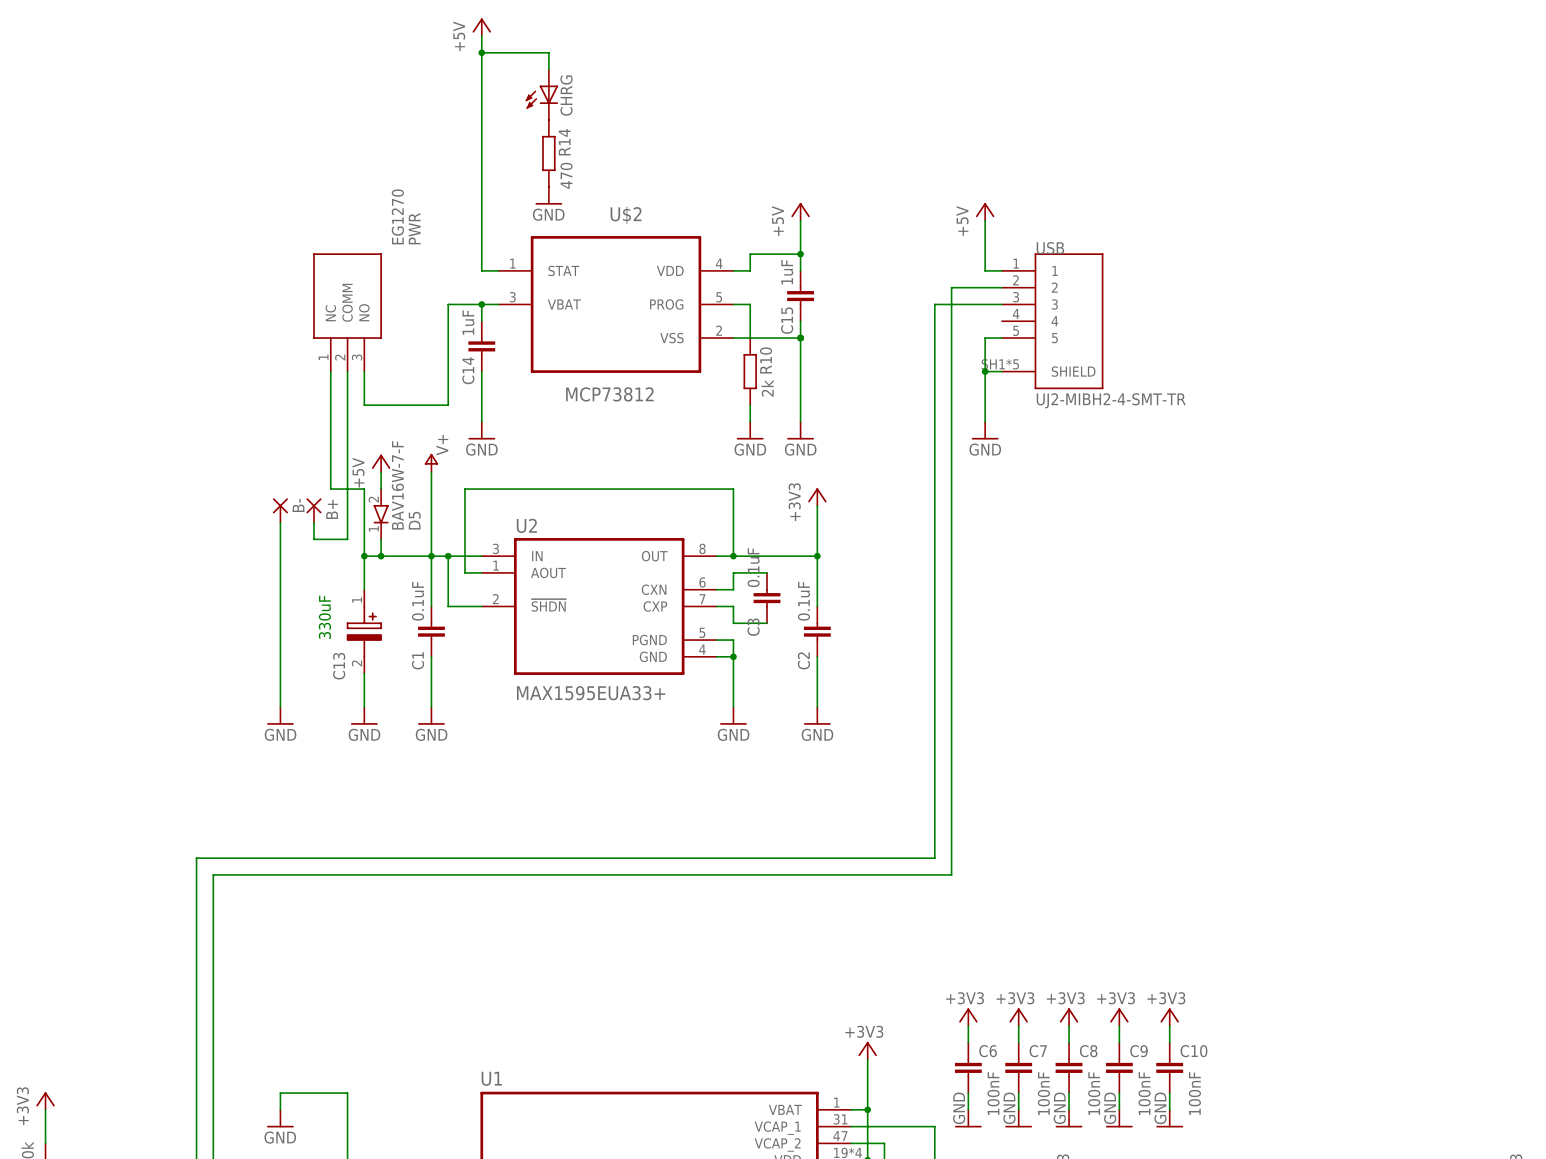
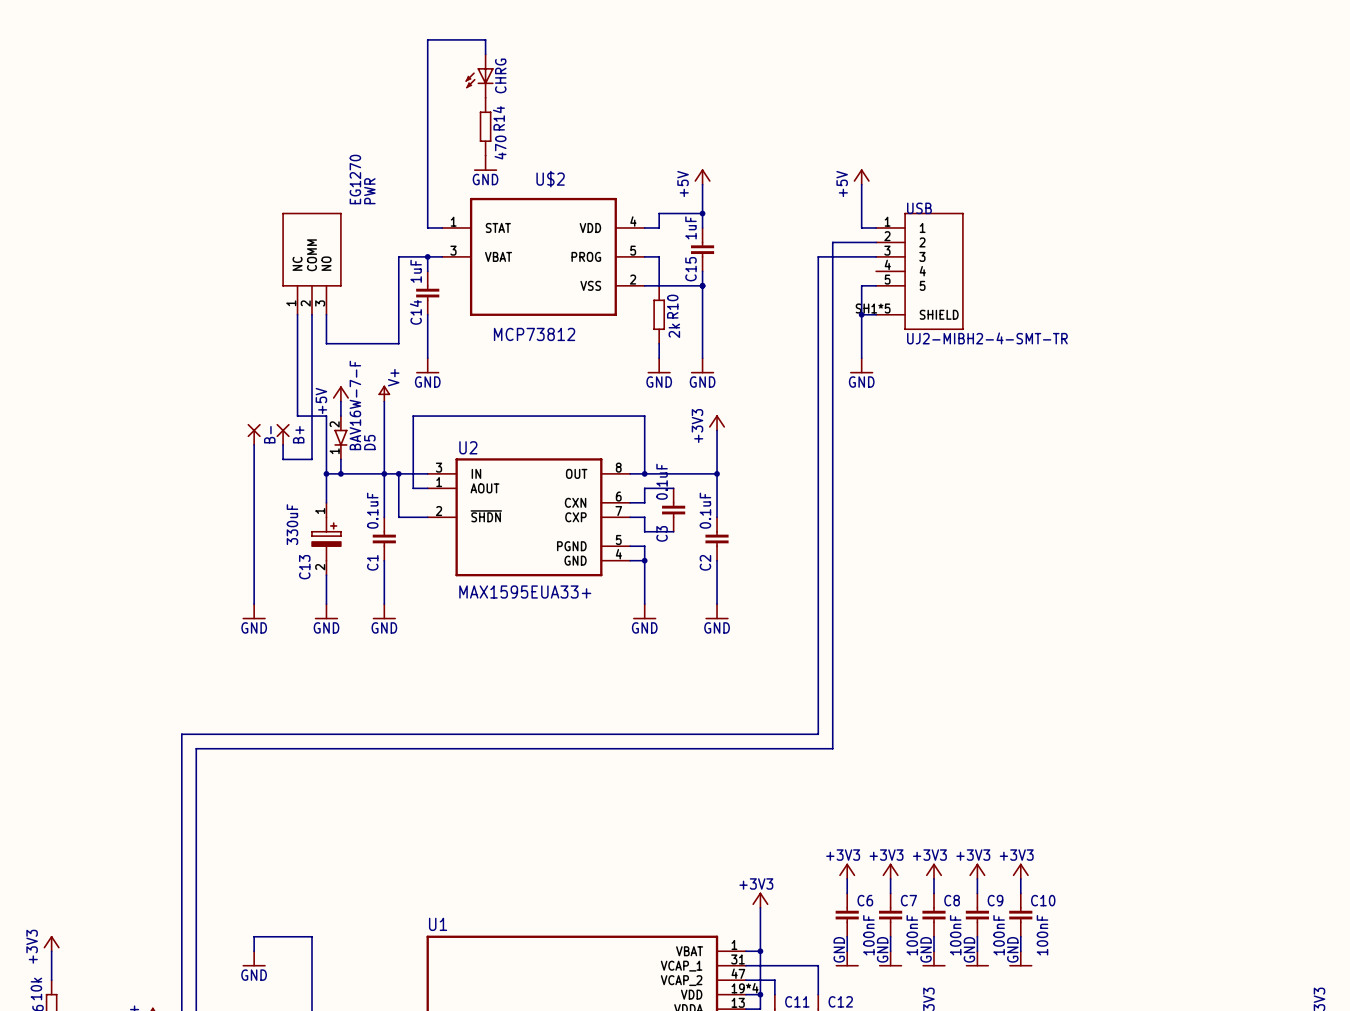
power symbol: +5V (481, 27) -> none
wire: (481, 36) (481, 52) -> none
junction: (481, 52) -> none

